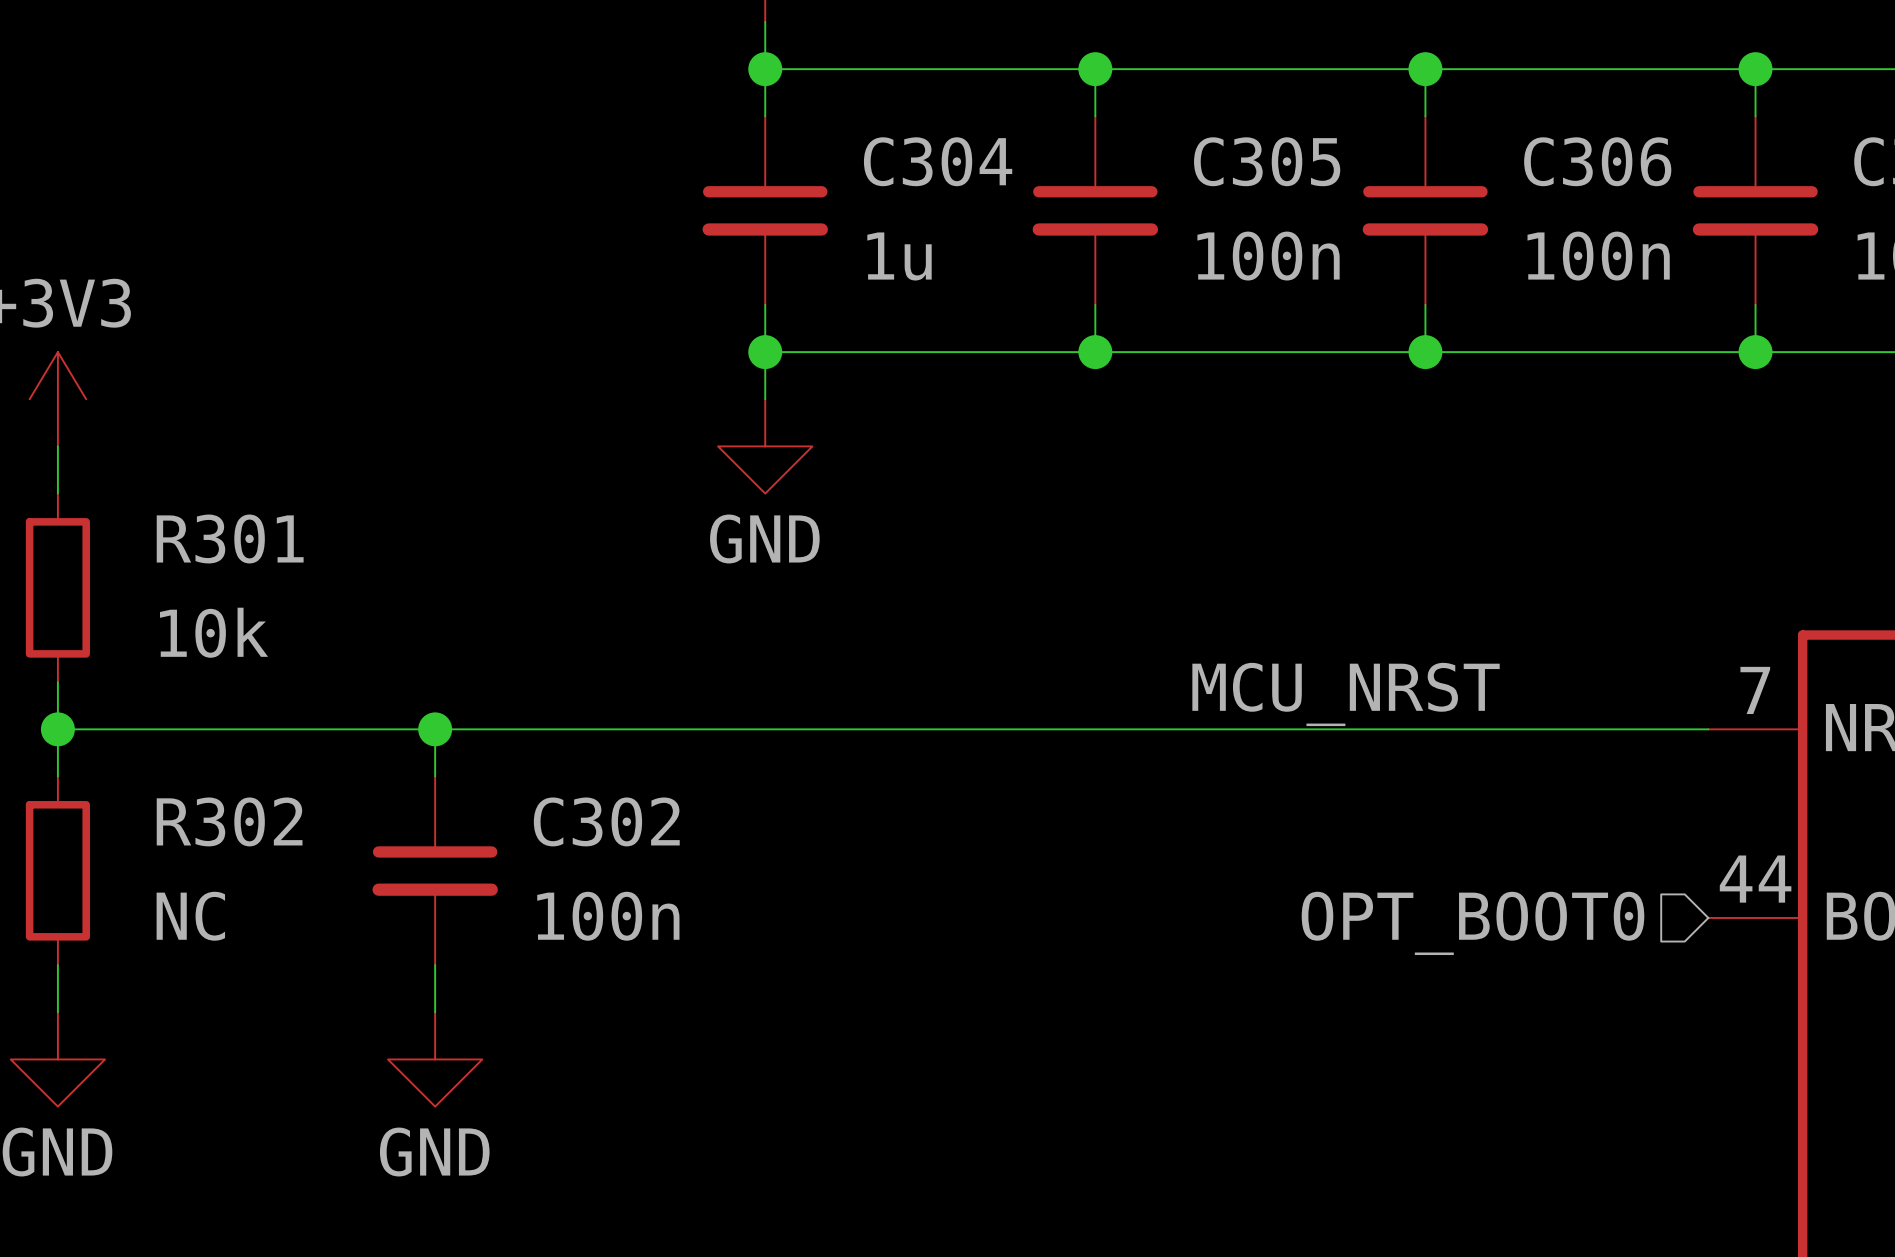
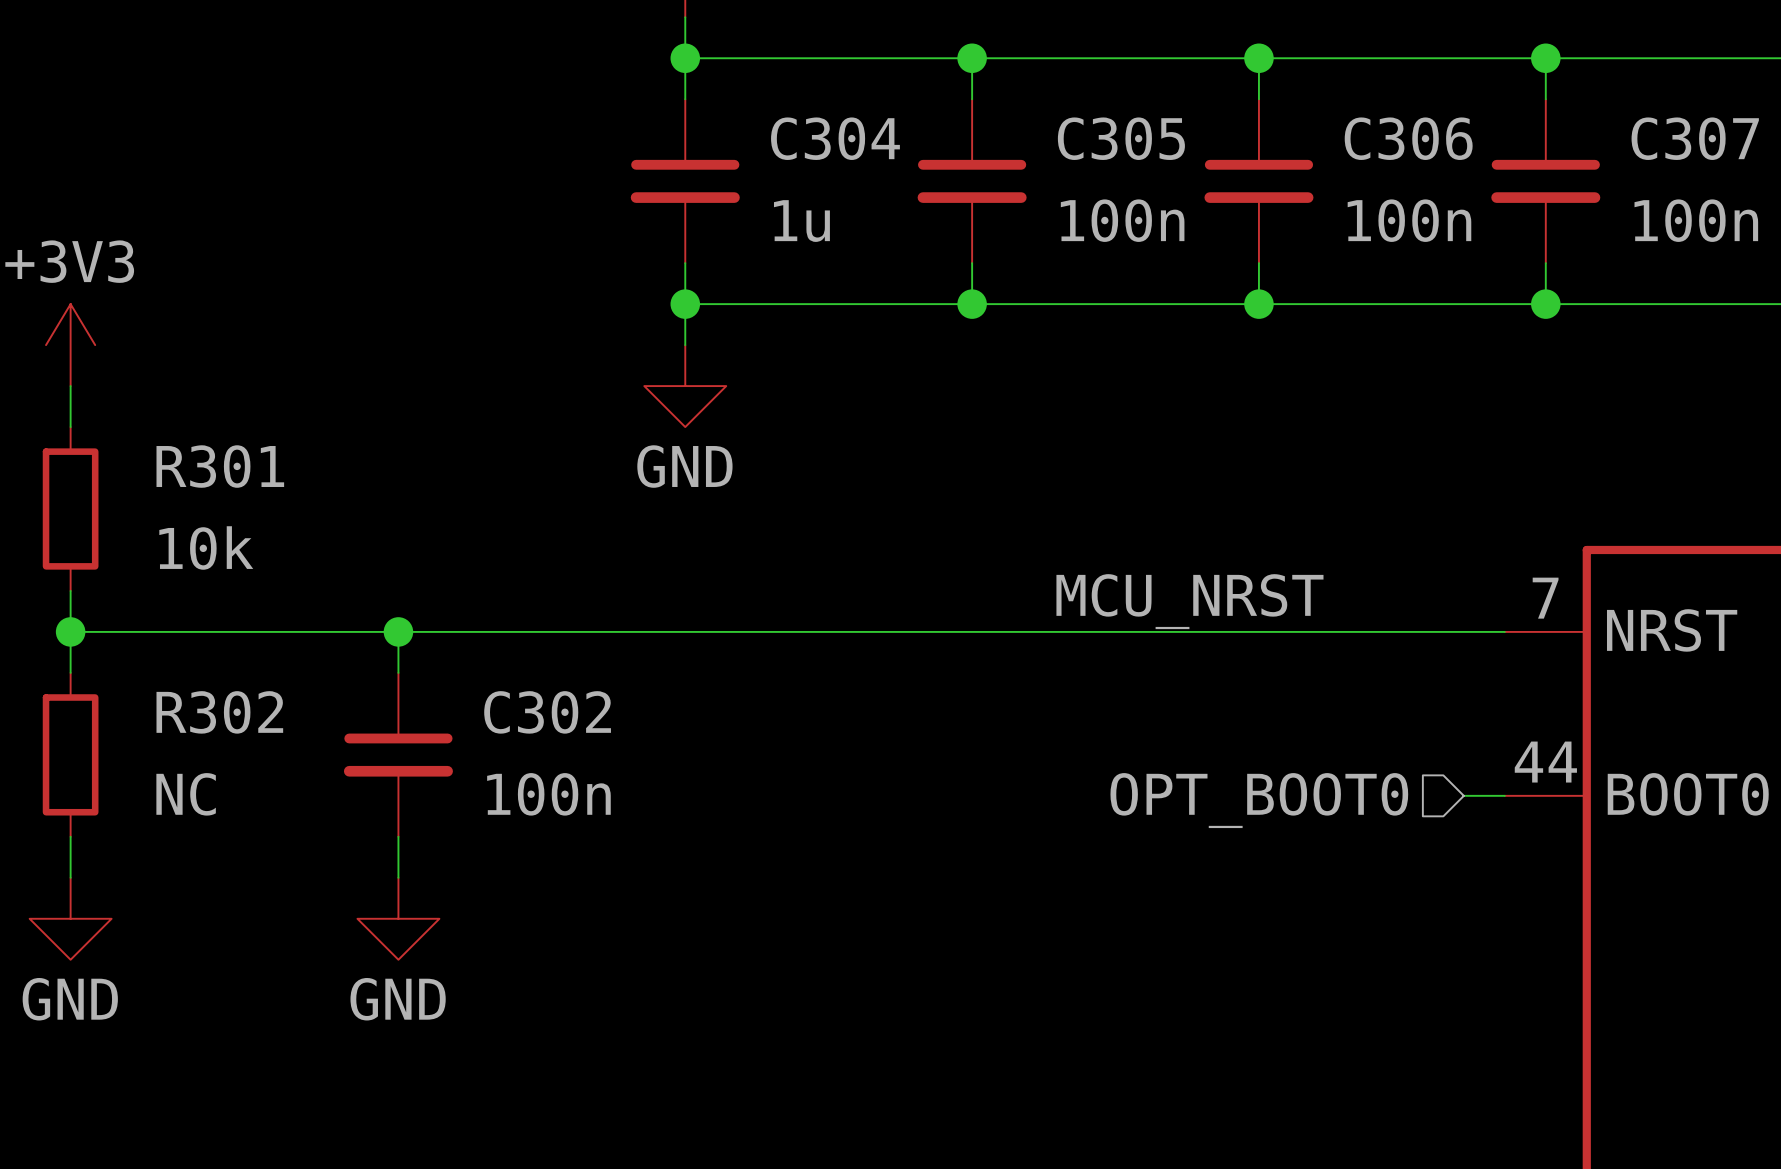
wire: none -> (1463, 795) (1504, 795)
hierarchical label position: OPT_BOOT0 (1473, 923) -> OPT_BOOT0 (1259, 800)

